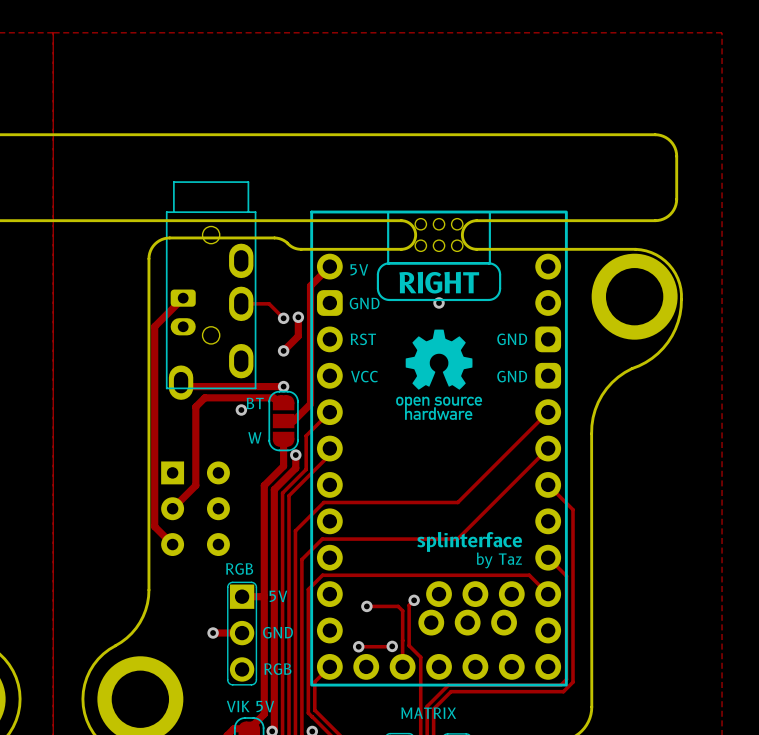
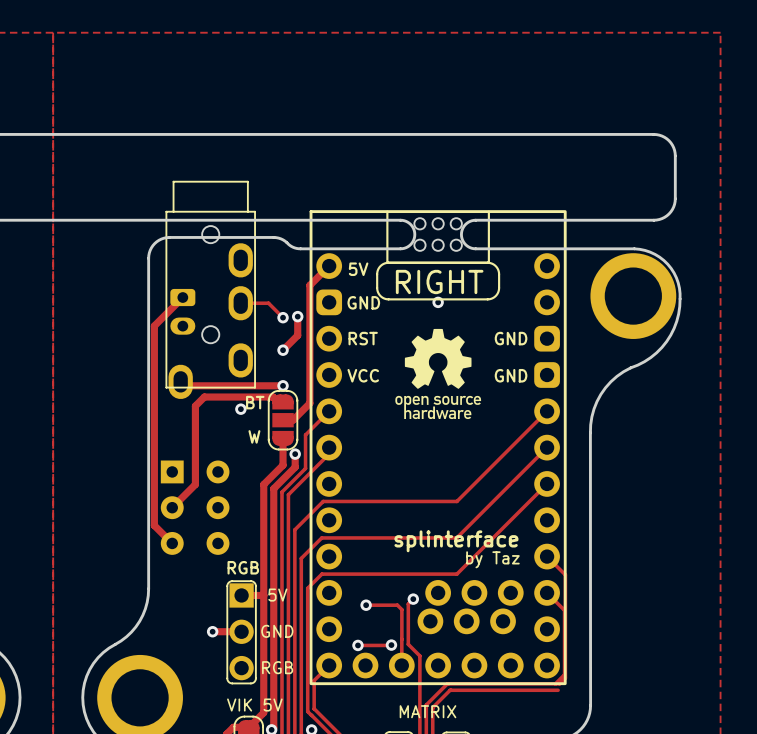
track: (548, 484) (573, 509) (573, 682) (563, 691) (559, 691) -> none
track: (457, 575) (529, 575) (548, 594) -> (456, 574) (547, 483)
track: none -> (547, 592) (564, 610) (564, 674) (555, 683)

